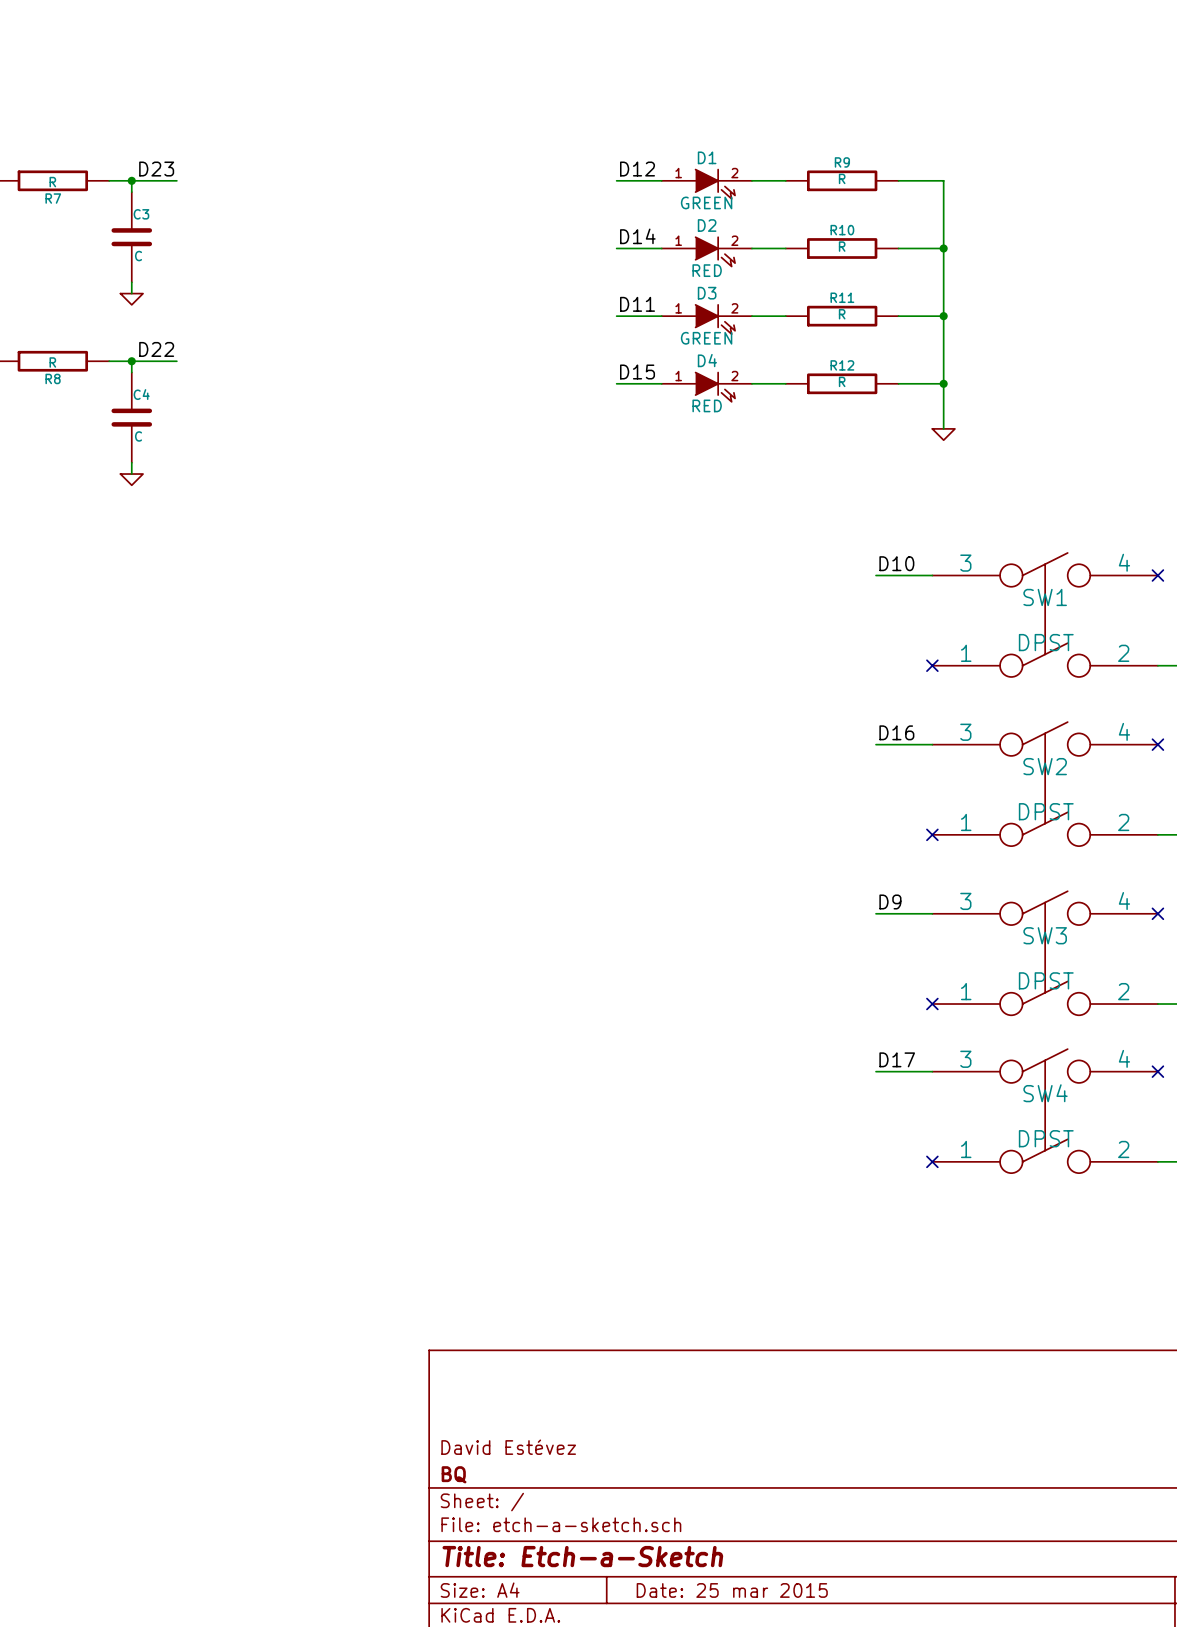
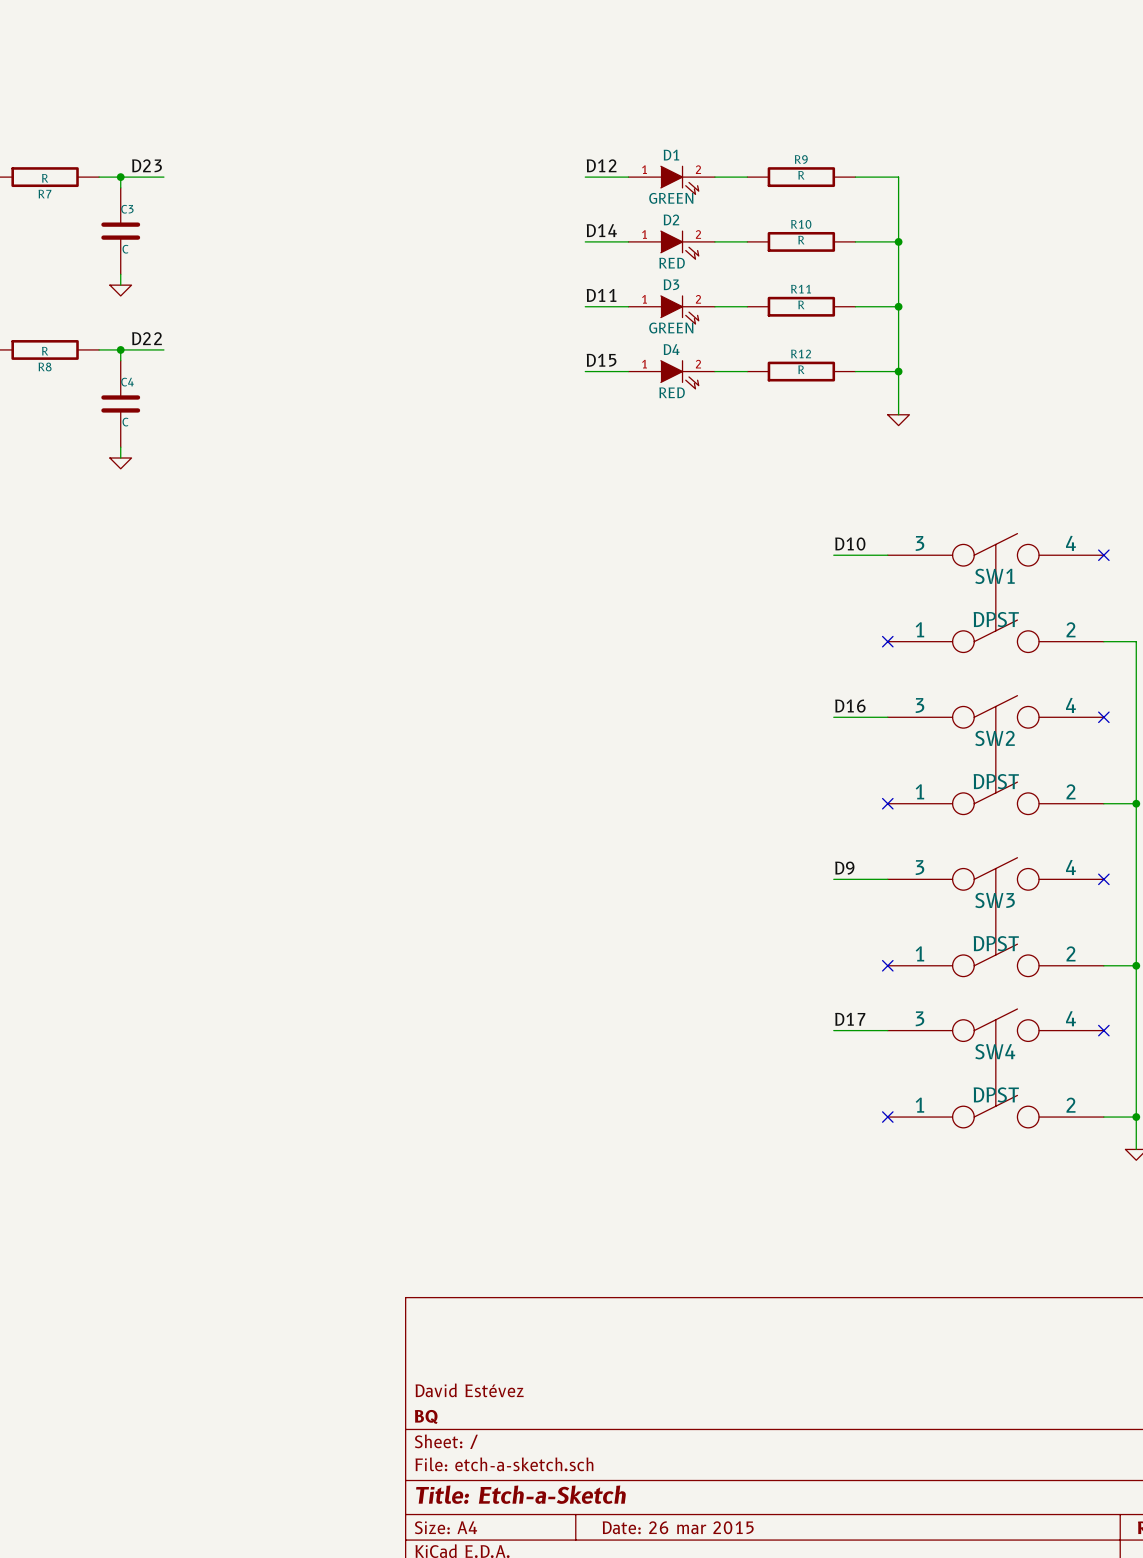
title block: Date: 25 mar 2015 (732, 1590) -> Date: 26 mar 2015 (678, 1527)

